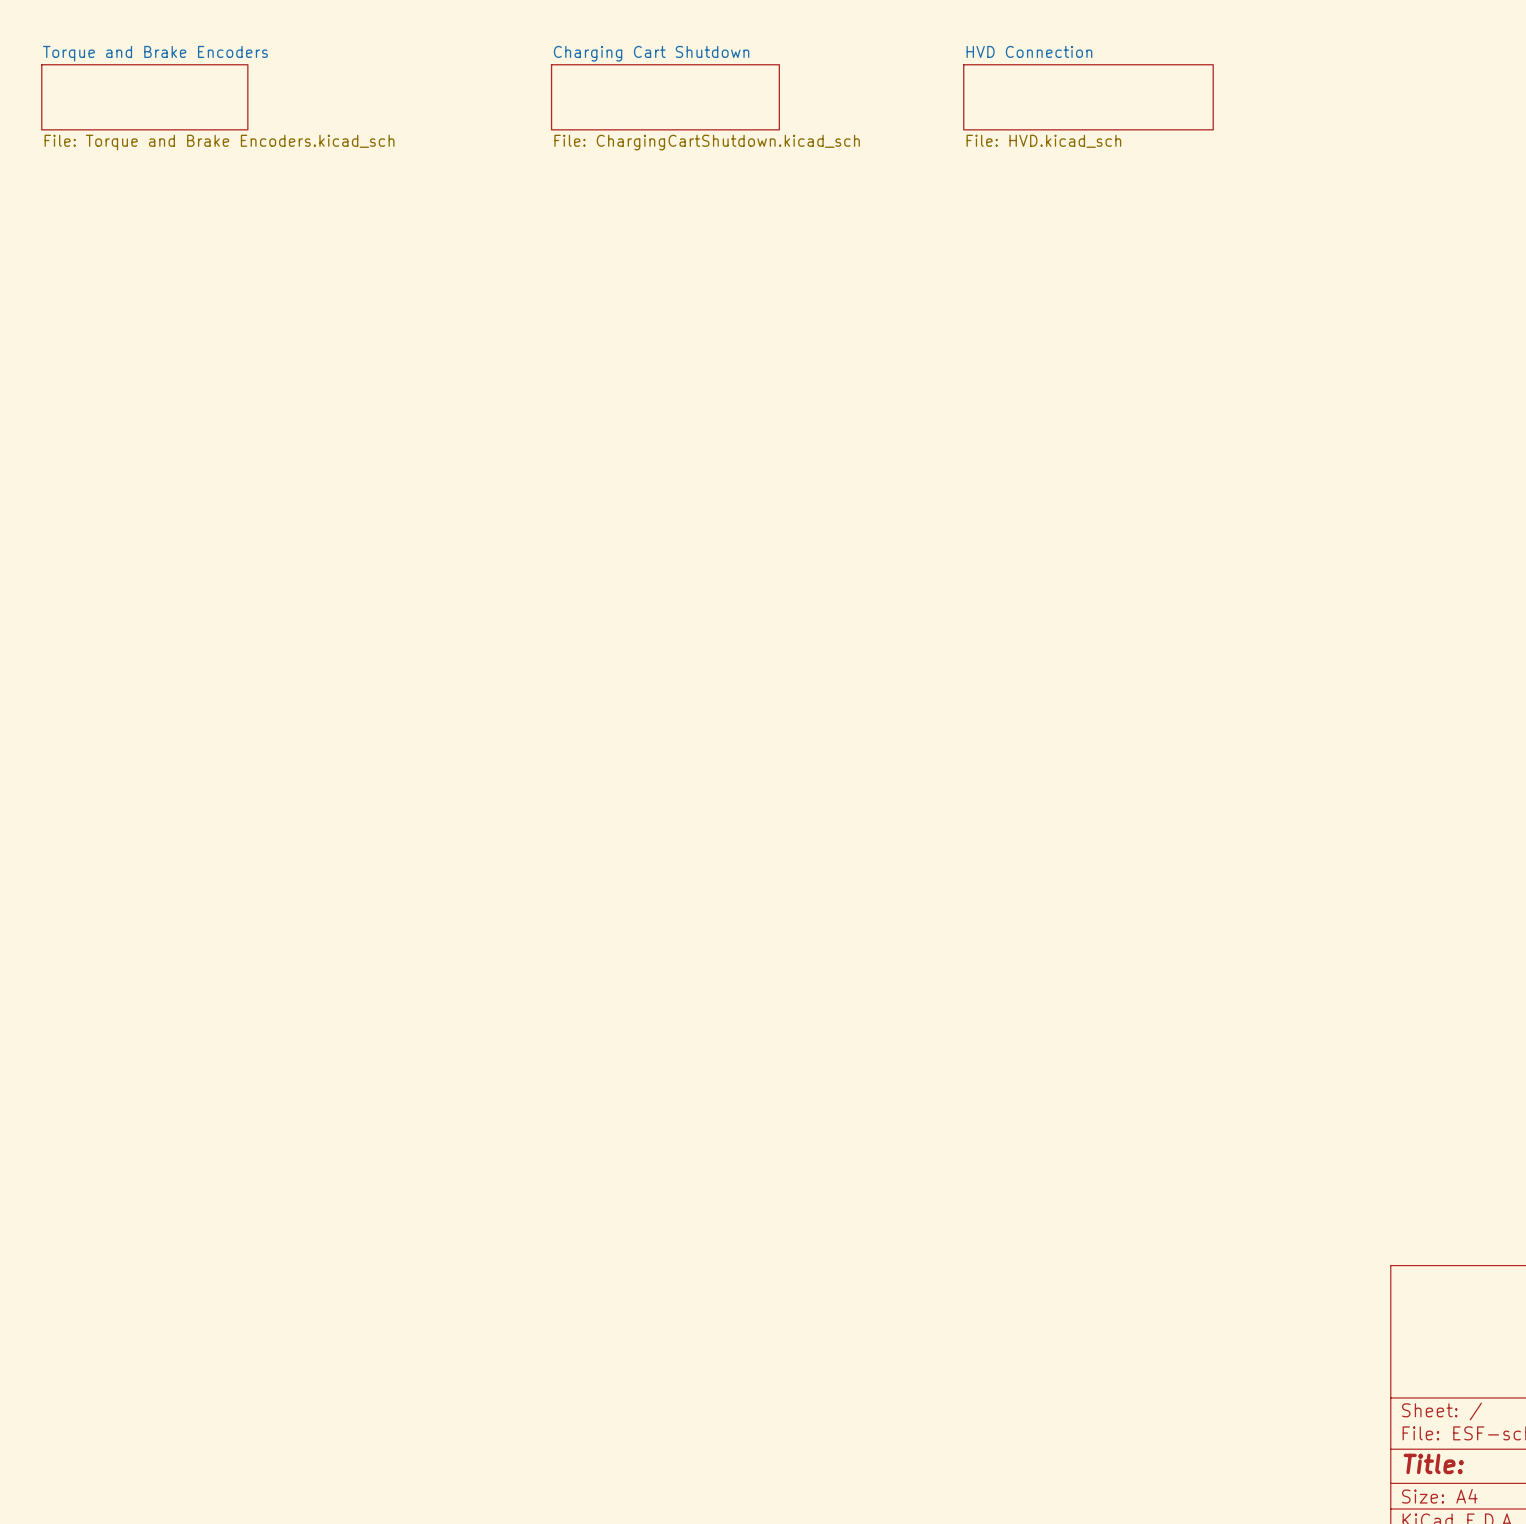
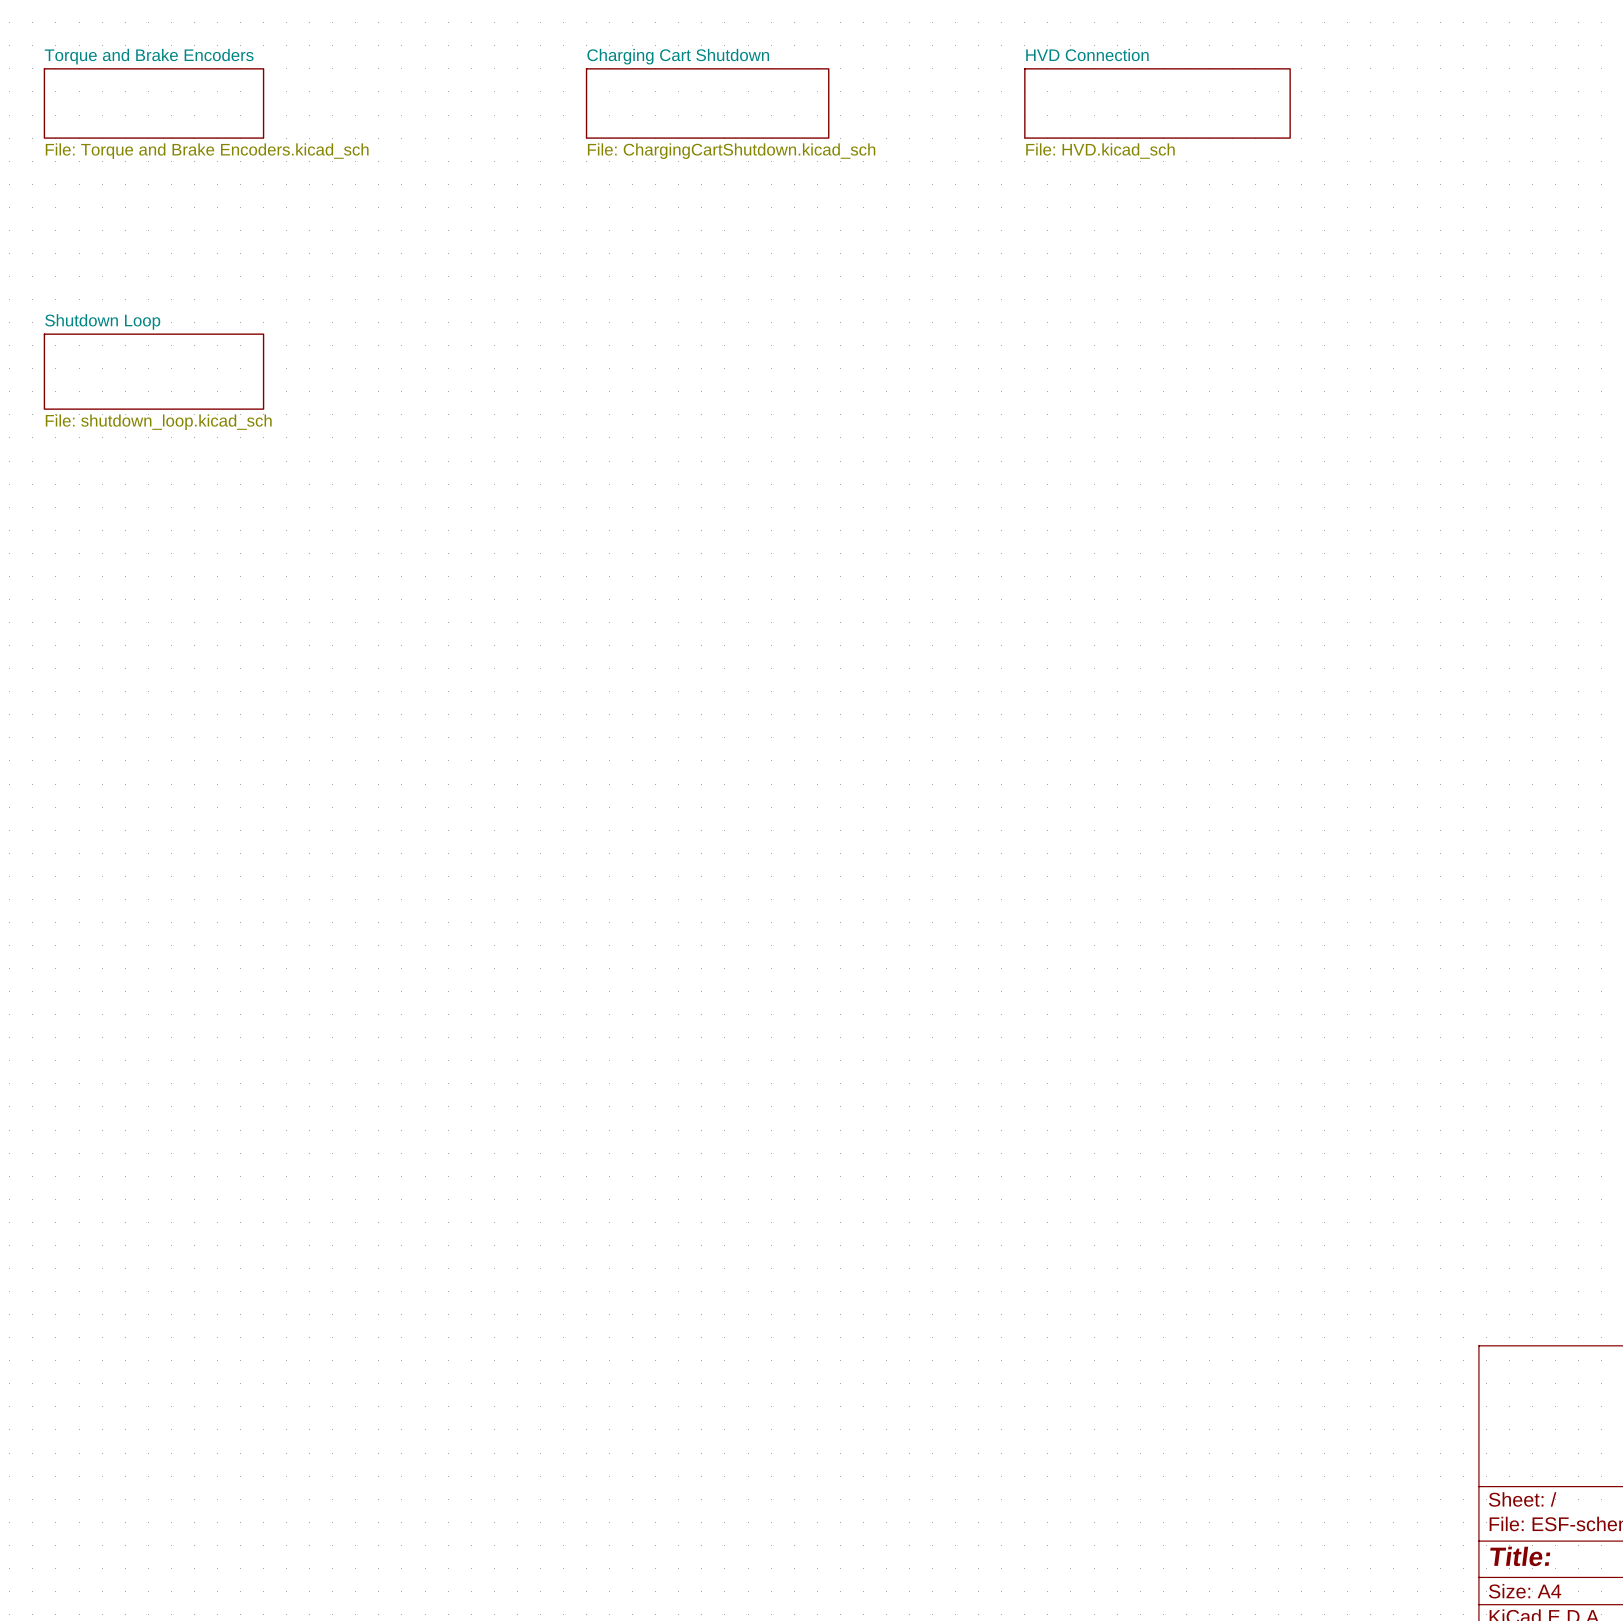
sheet Shutdown Loop: none -> File: shutdown_loop.kicad_sch (153, 371)

